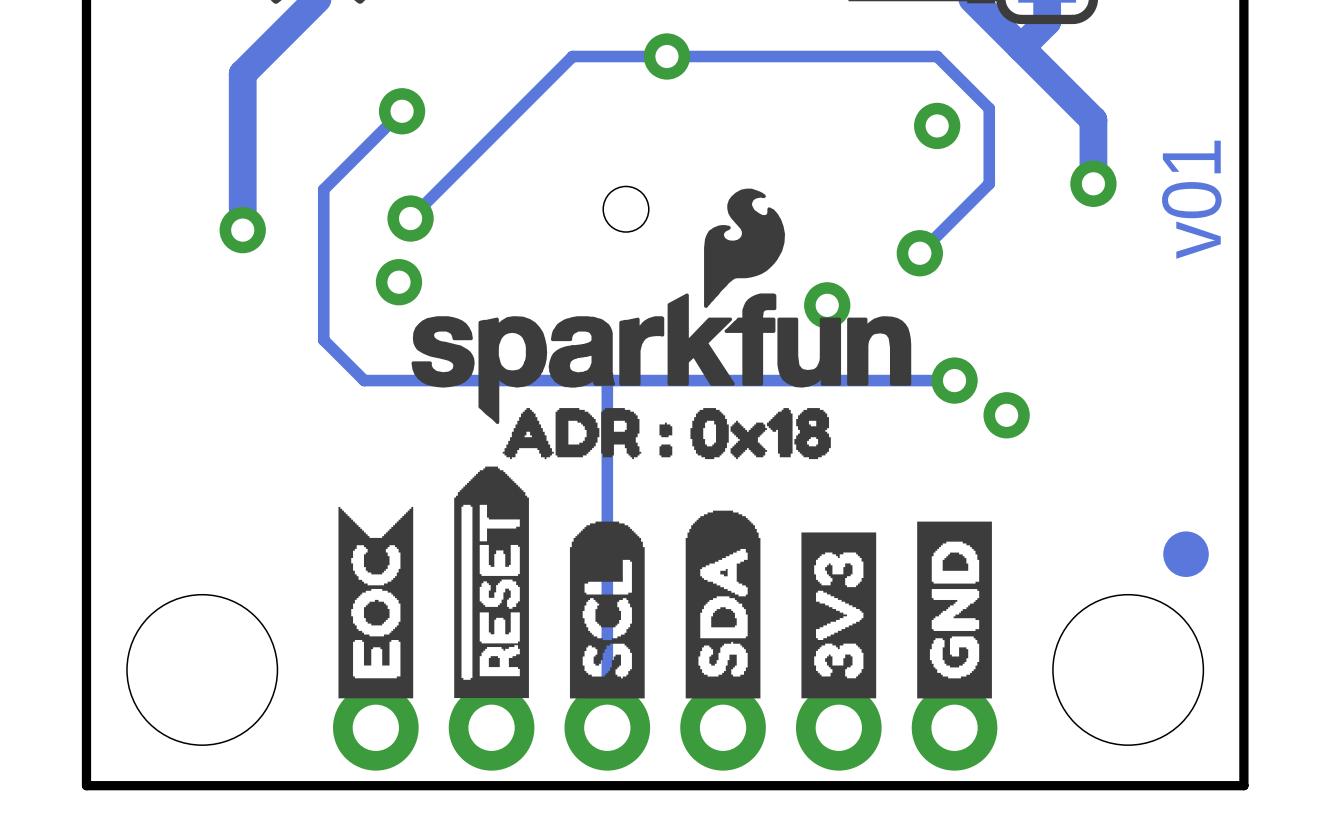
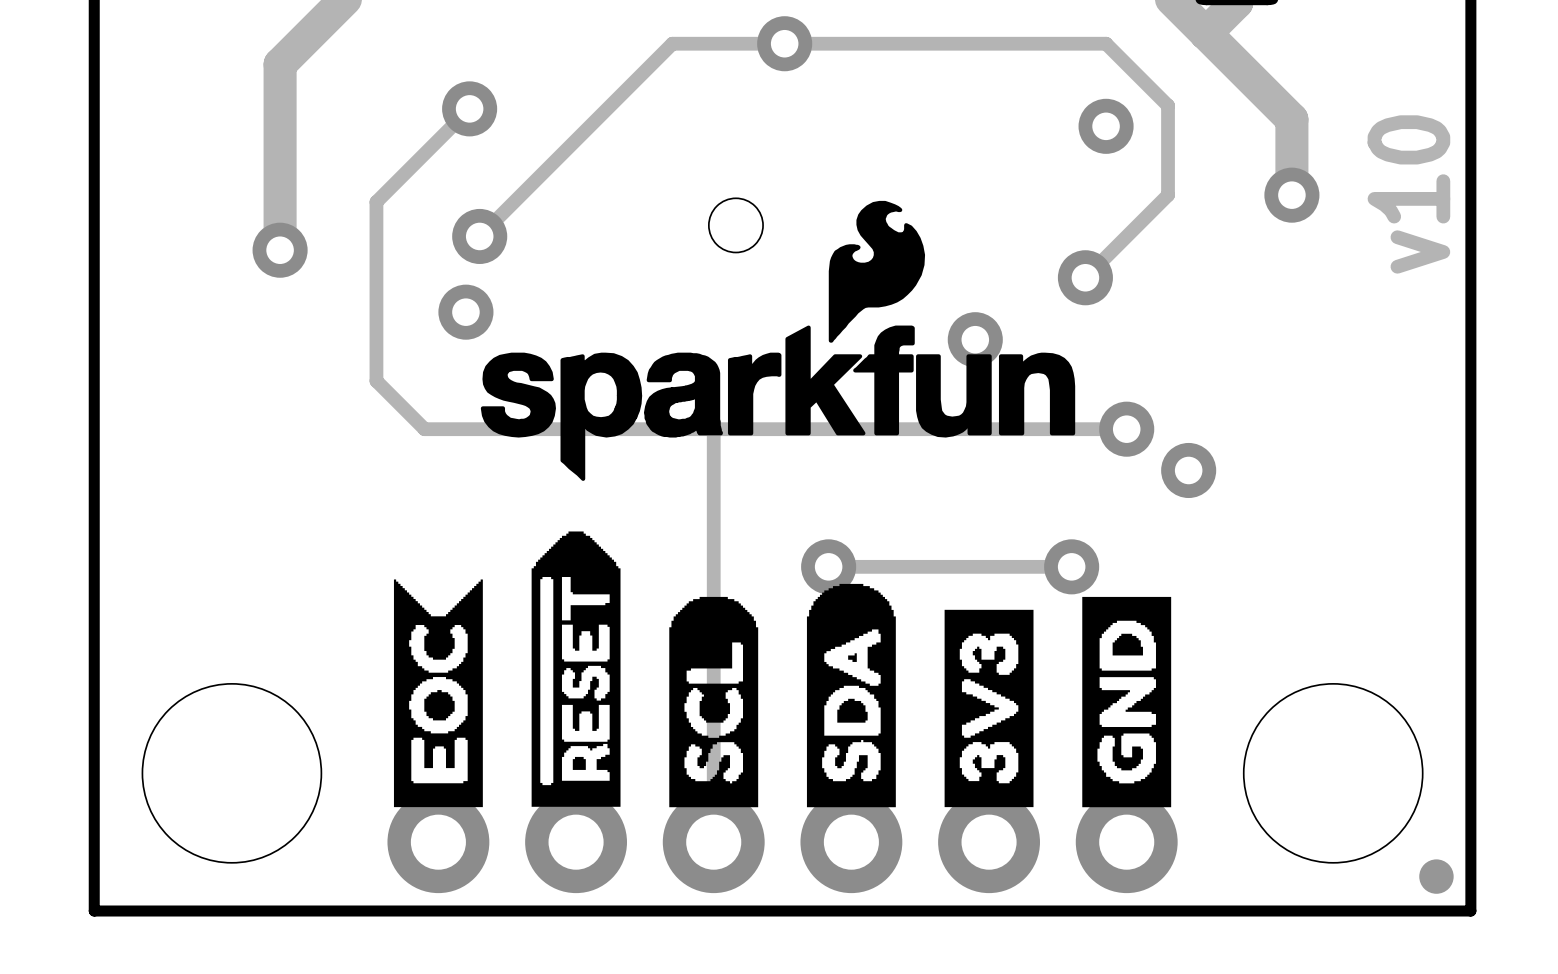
text: v01 (1191, 199) -> v10 (1408, 194)
drawing: [502, 408, 831, 460] -> none
via: none -> (828, 566)
track: none -> (1071, 566) (828, 566)
via: none -> (1071, 566)
part: (1186, 554) -> none
part: none -> (1436, 876)

